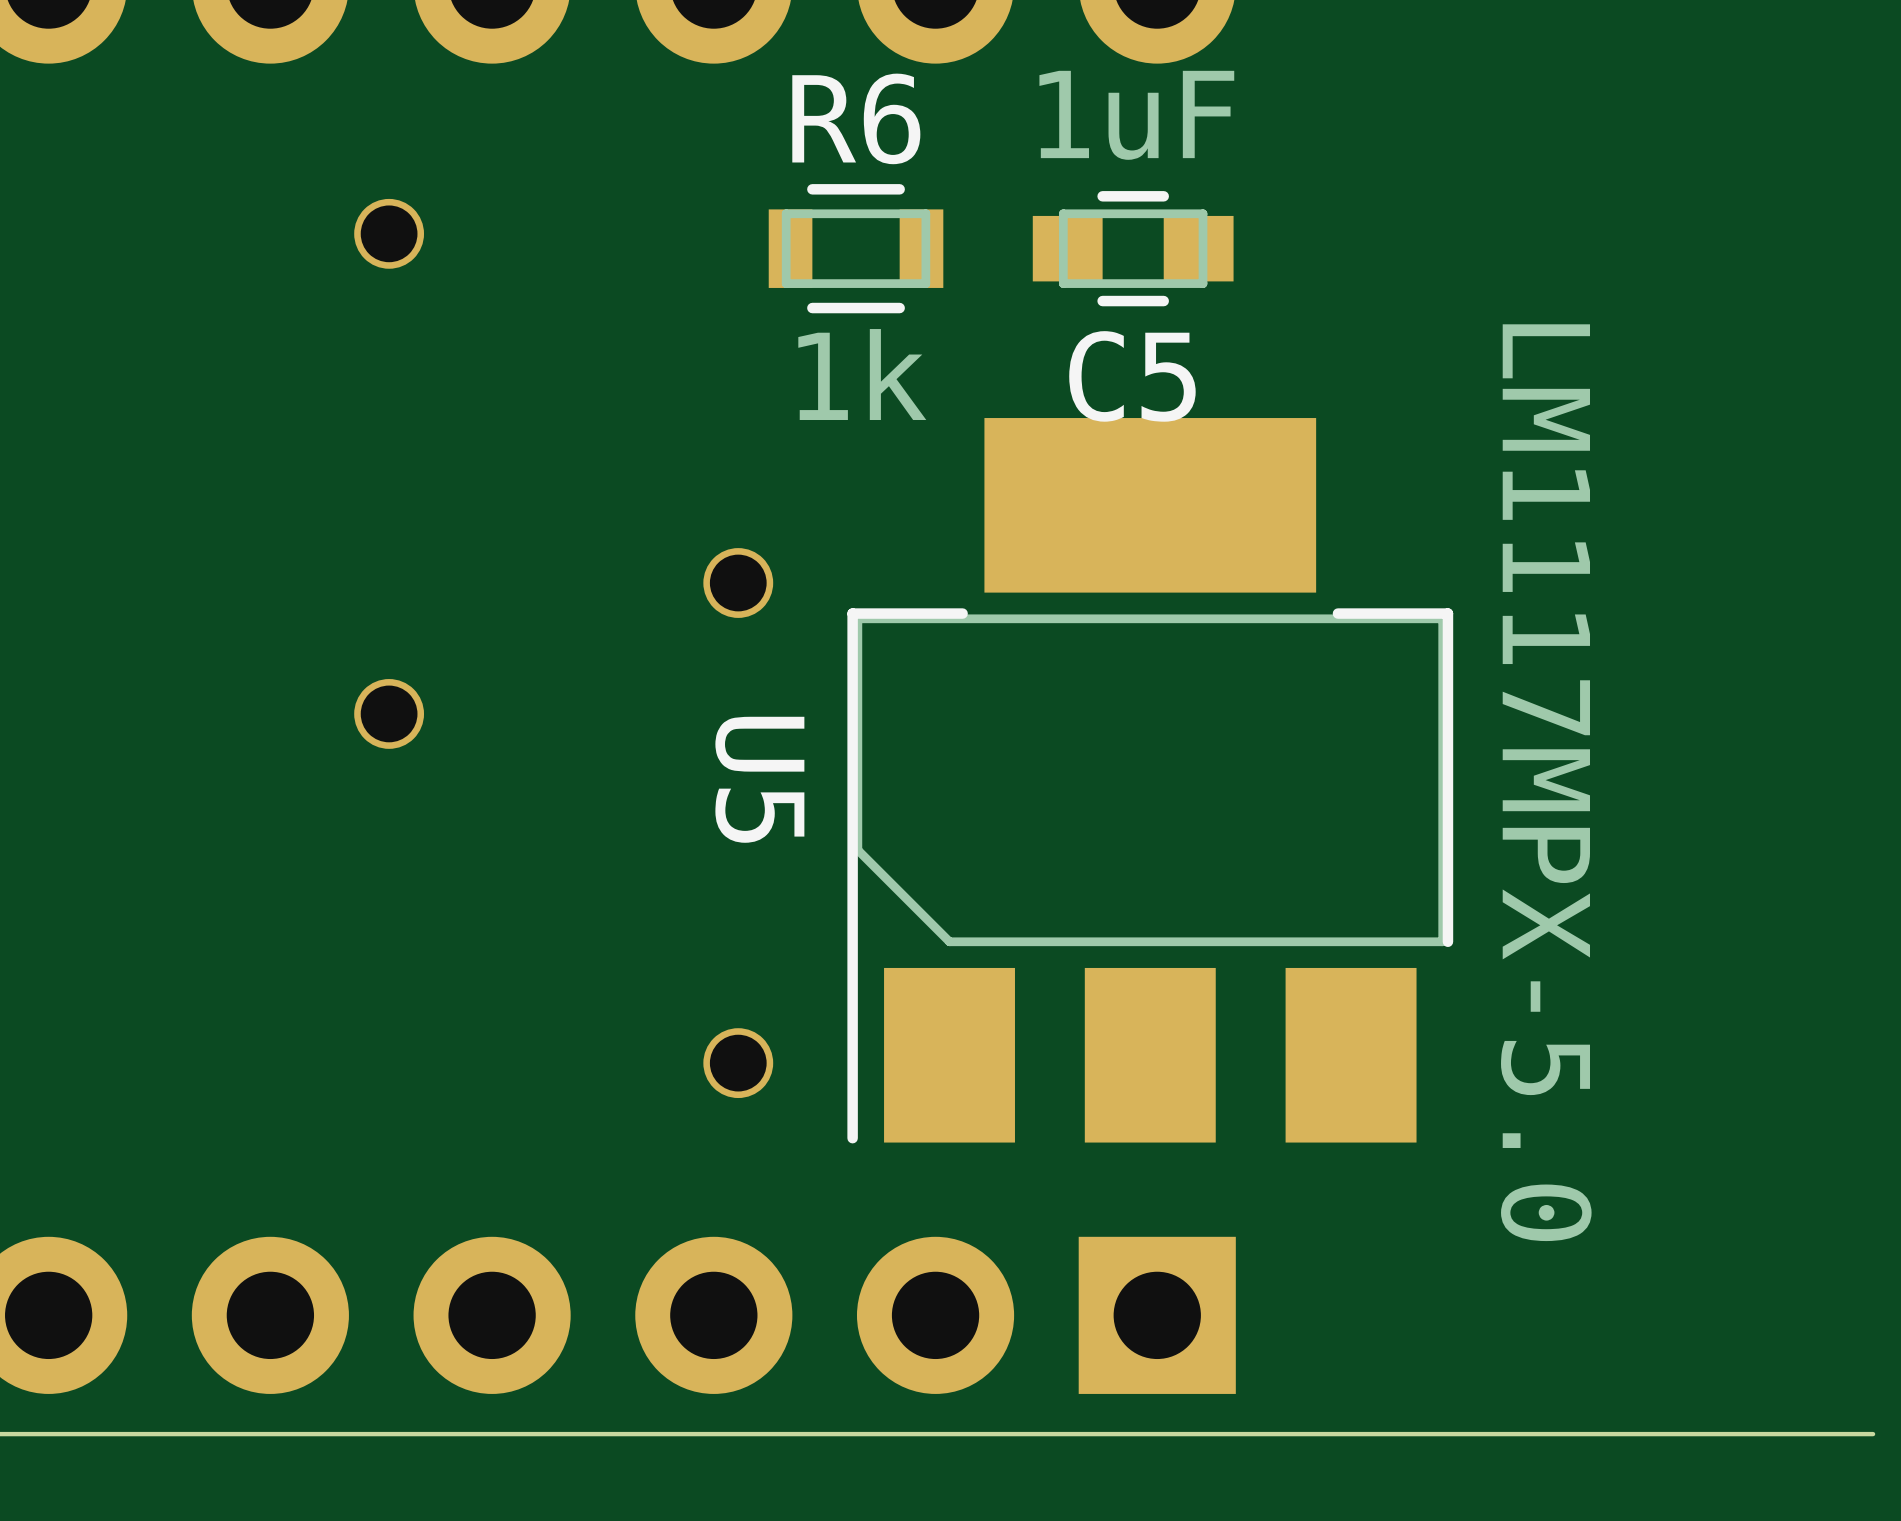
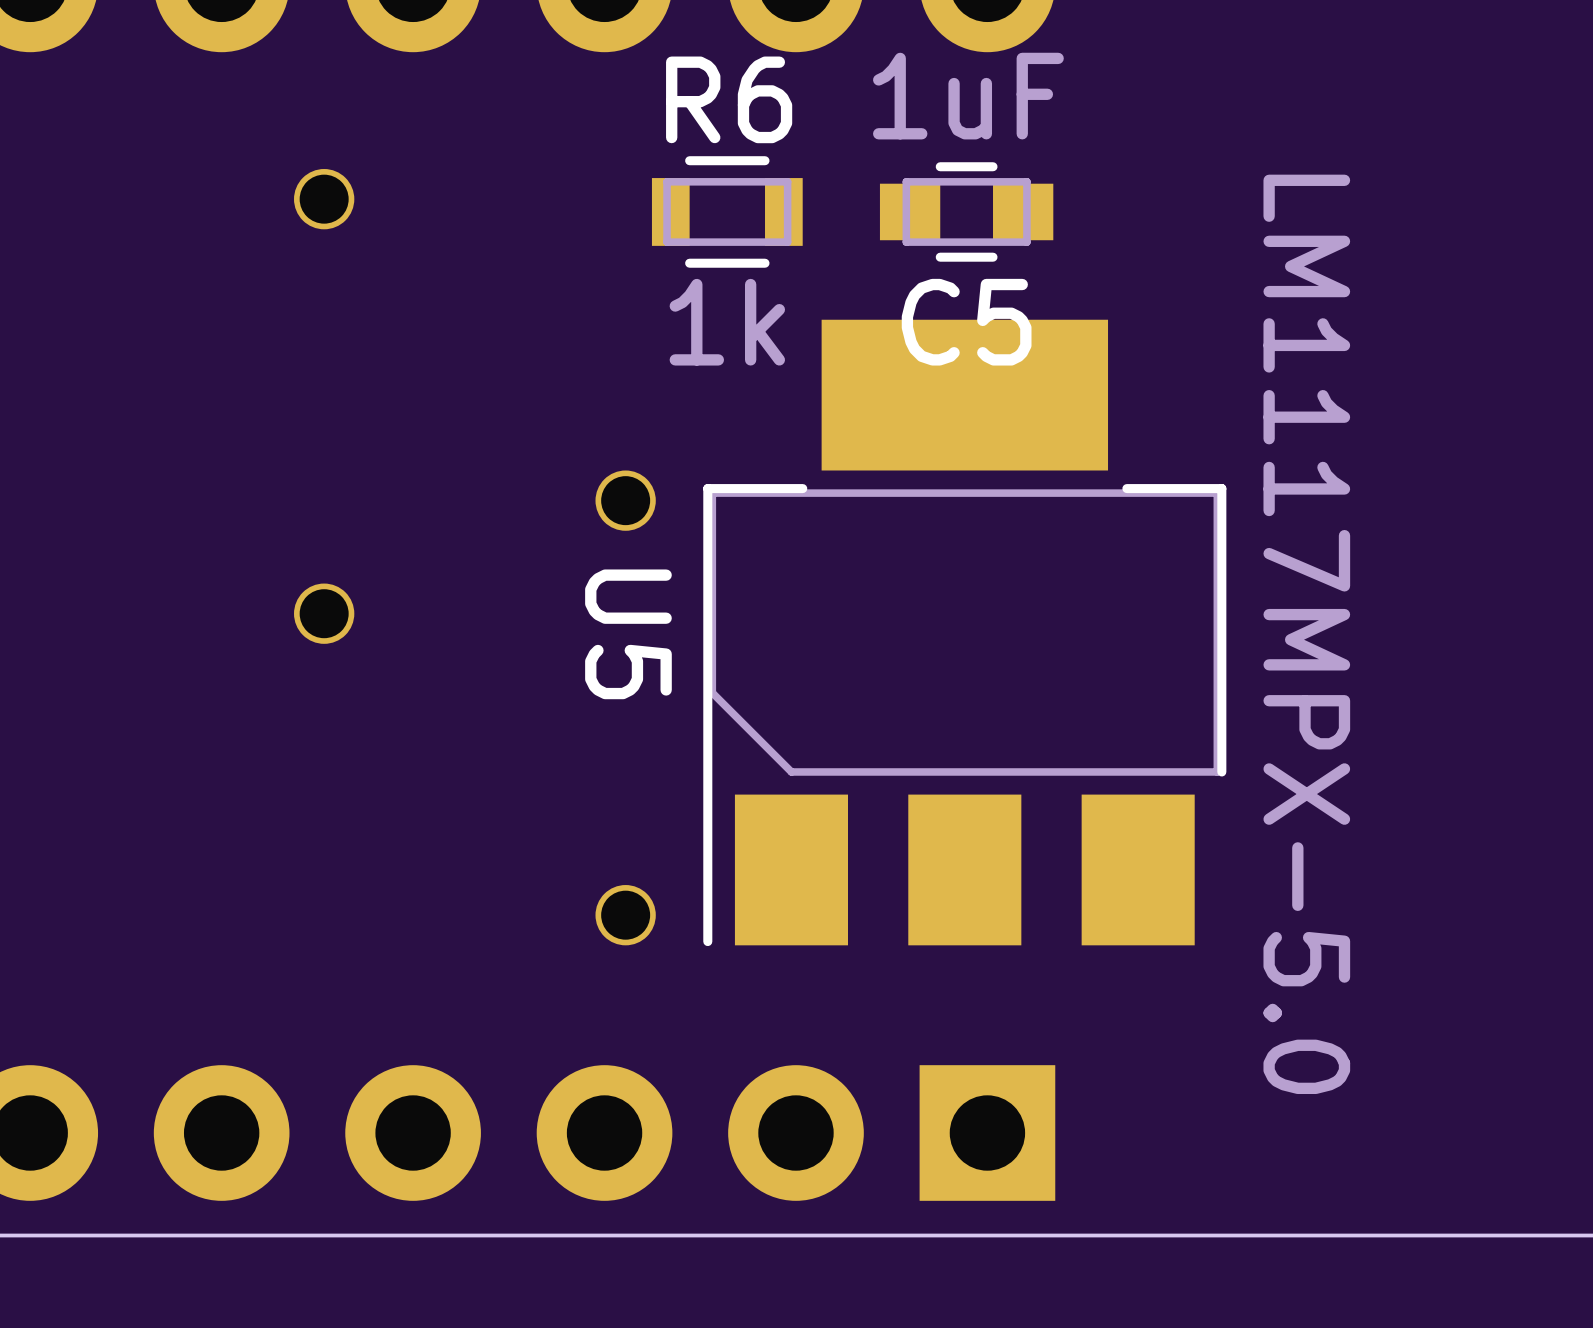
U5 position: (1150, 780) -> (964, 632)

